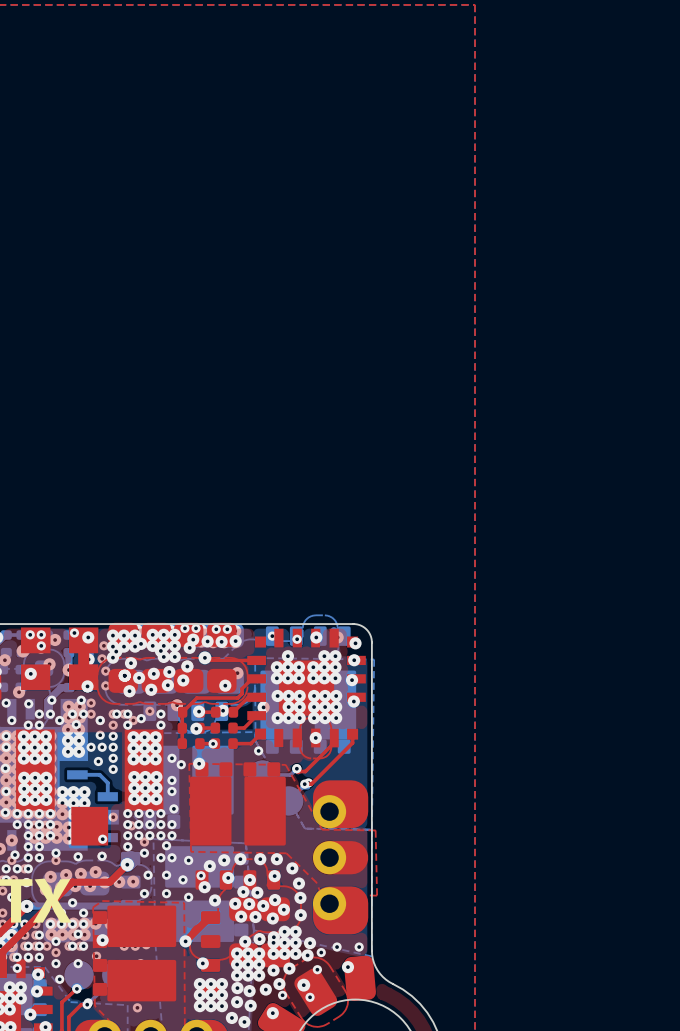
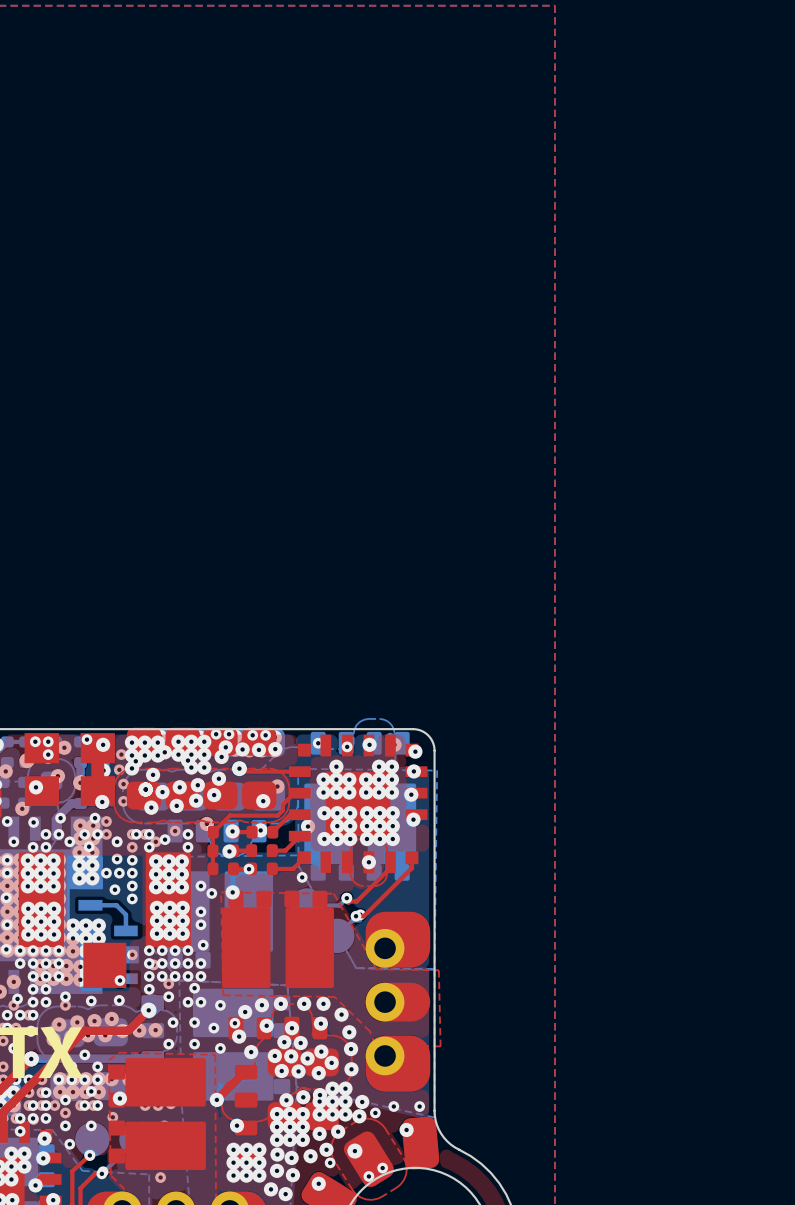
via: (317, 969) -> none
via: (310, 997) -> none
via: none -> (382, 1168)
via: none -> (368, 1176)

